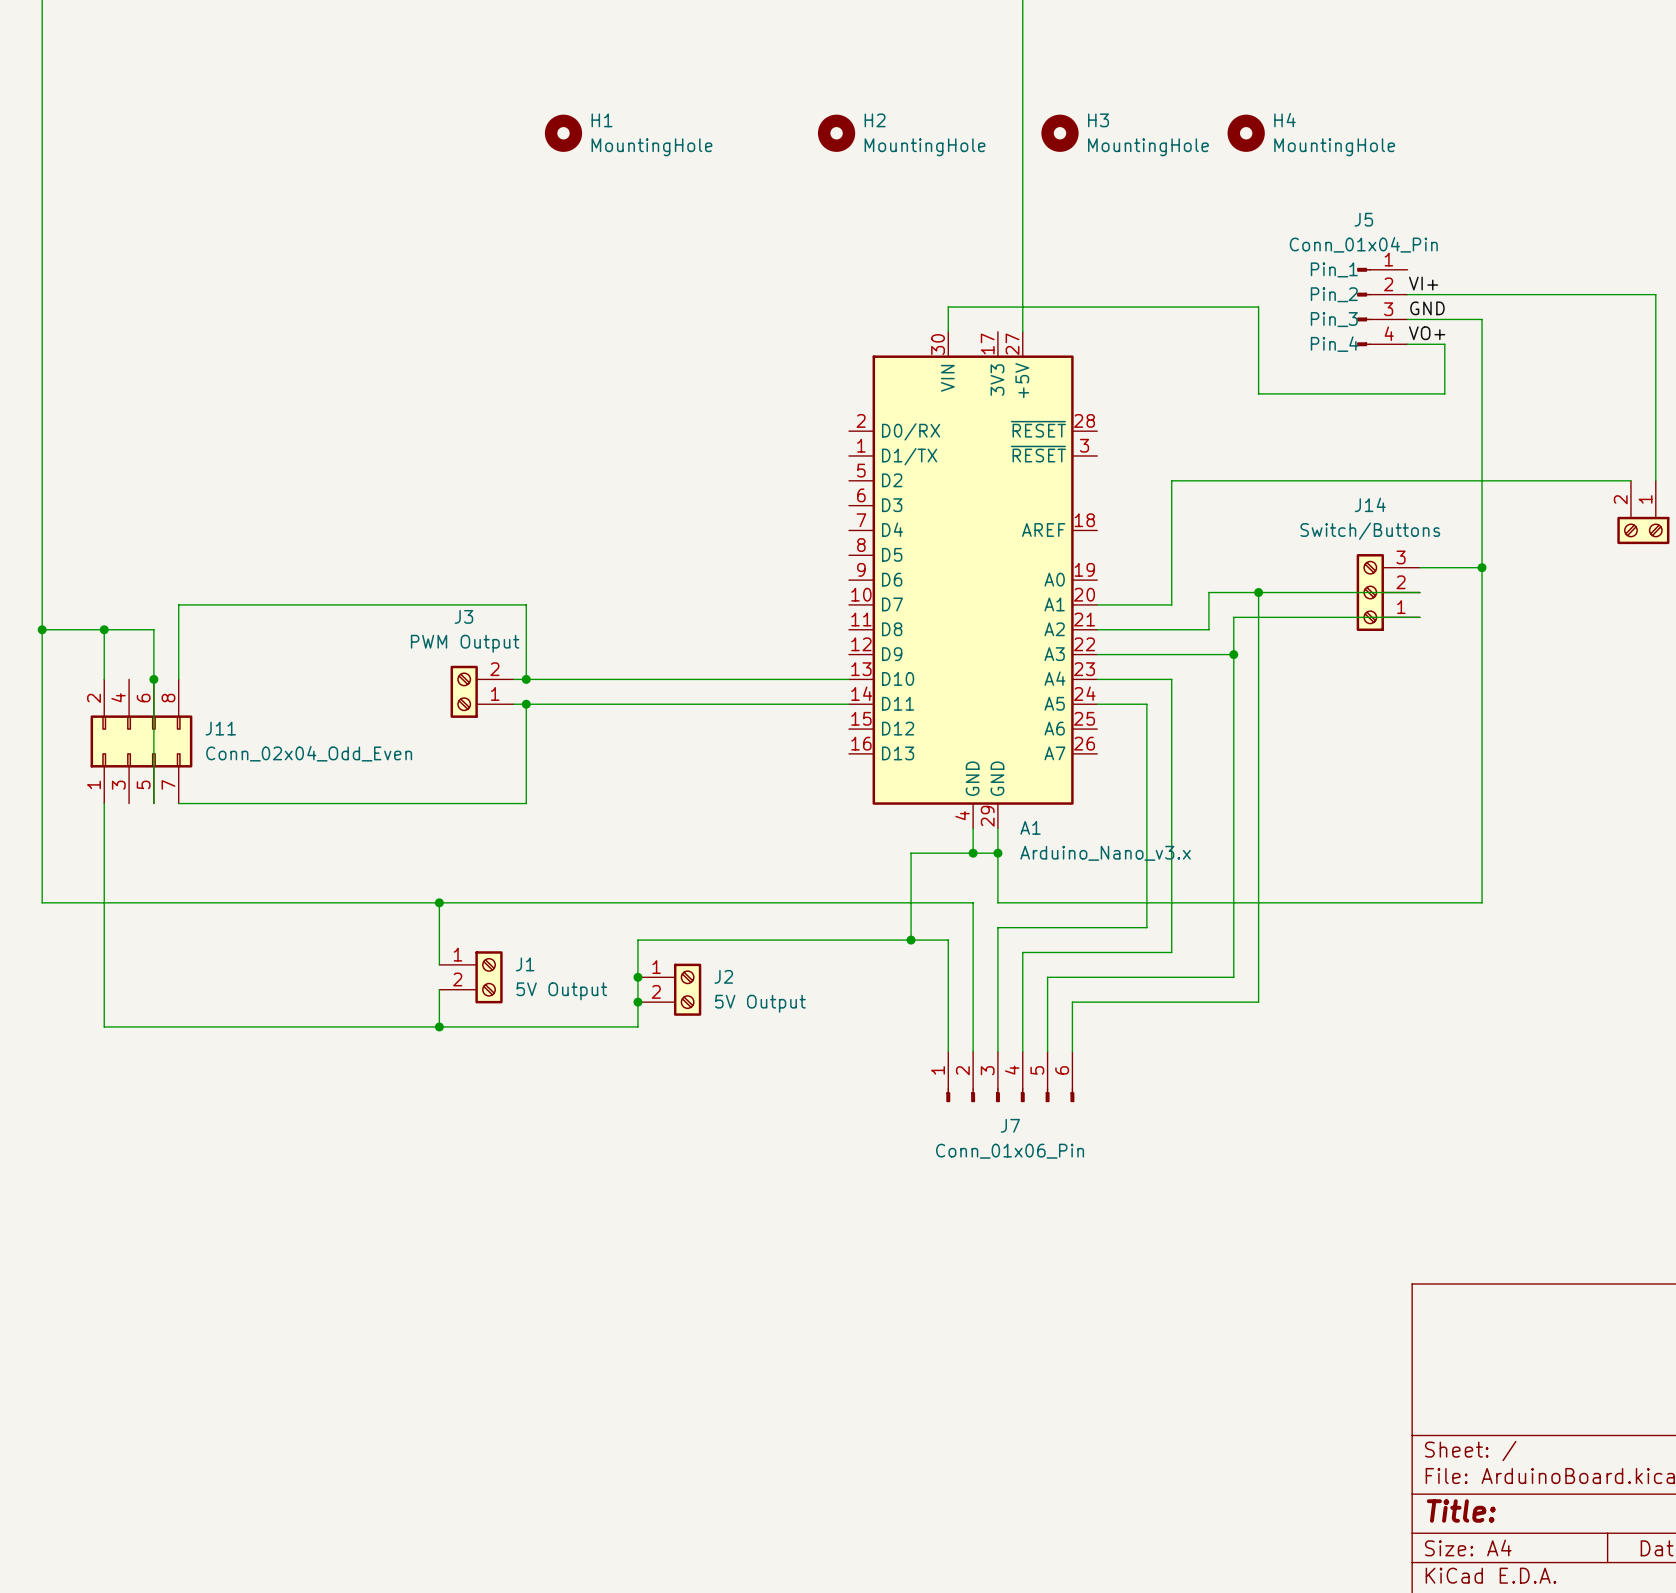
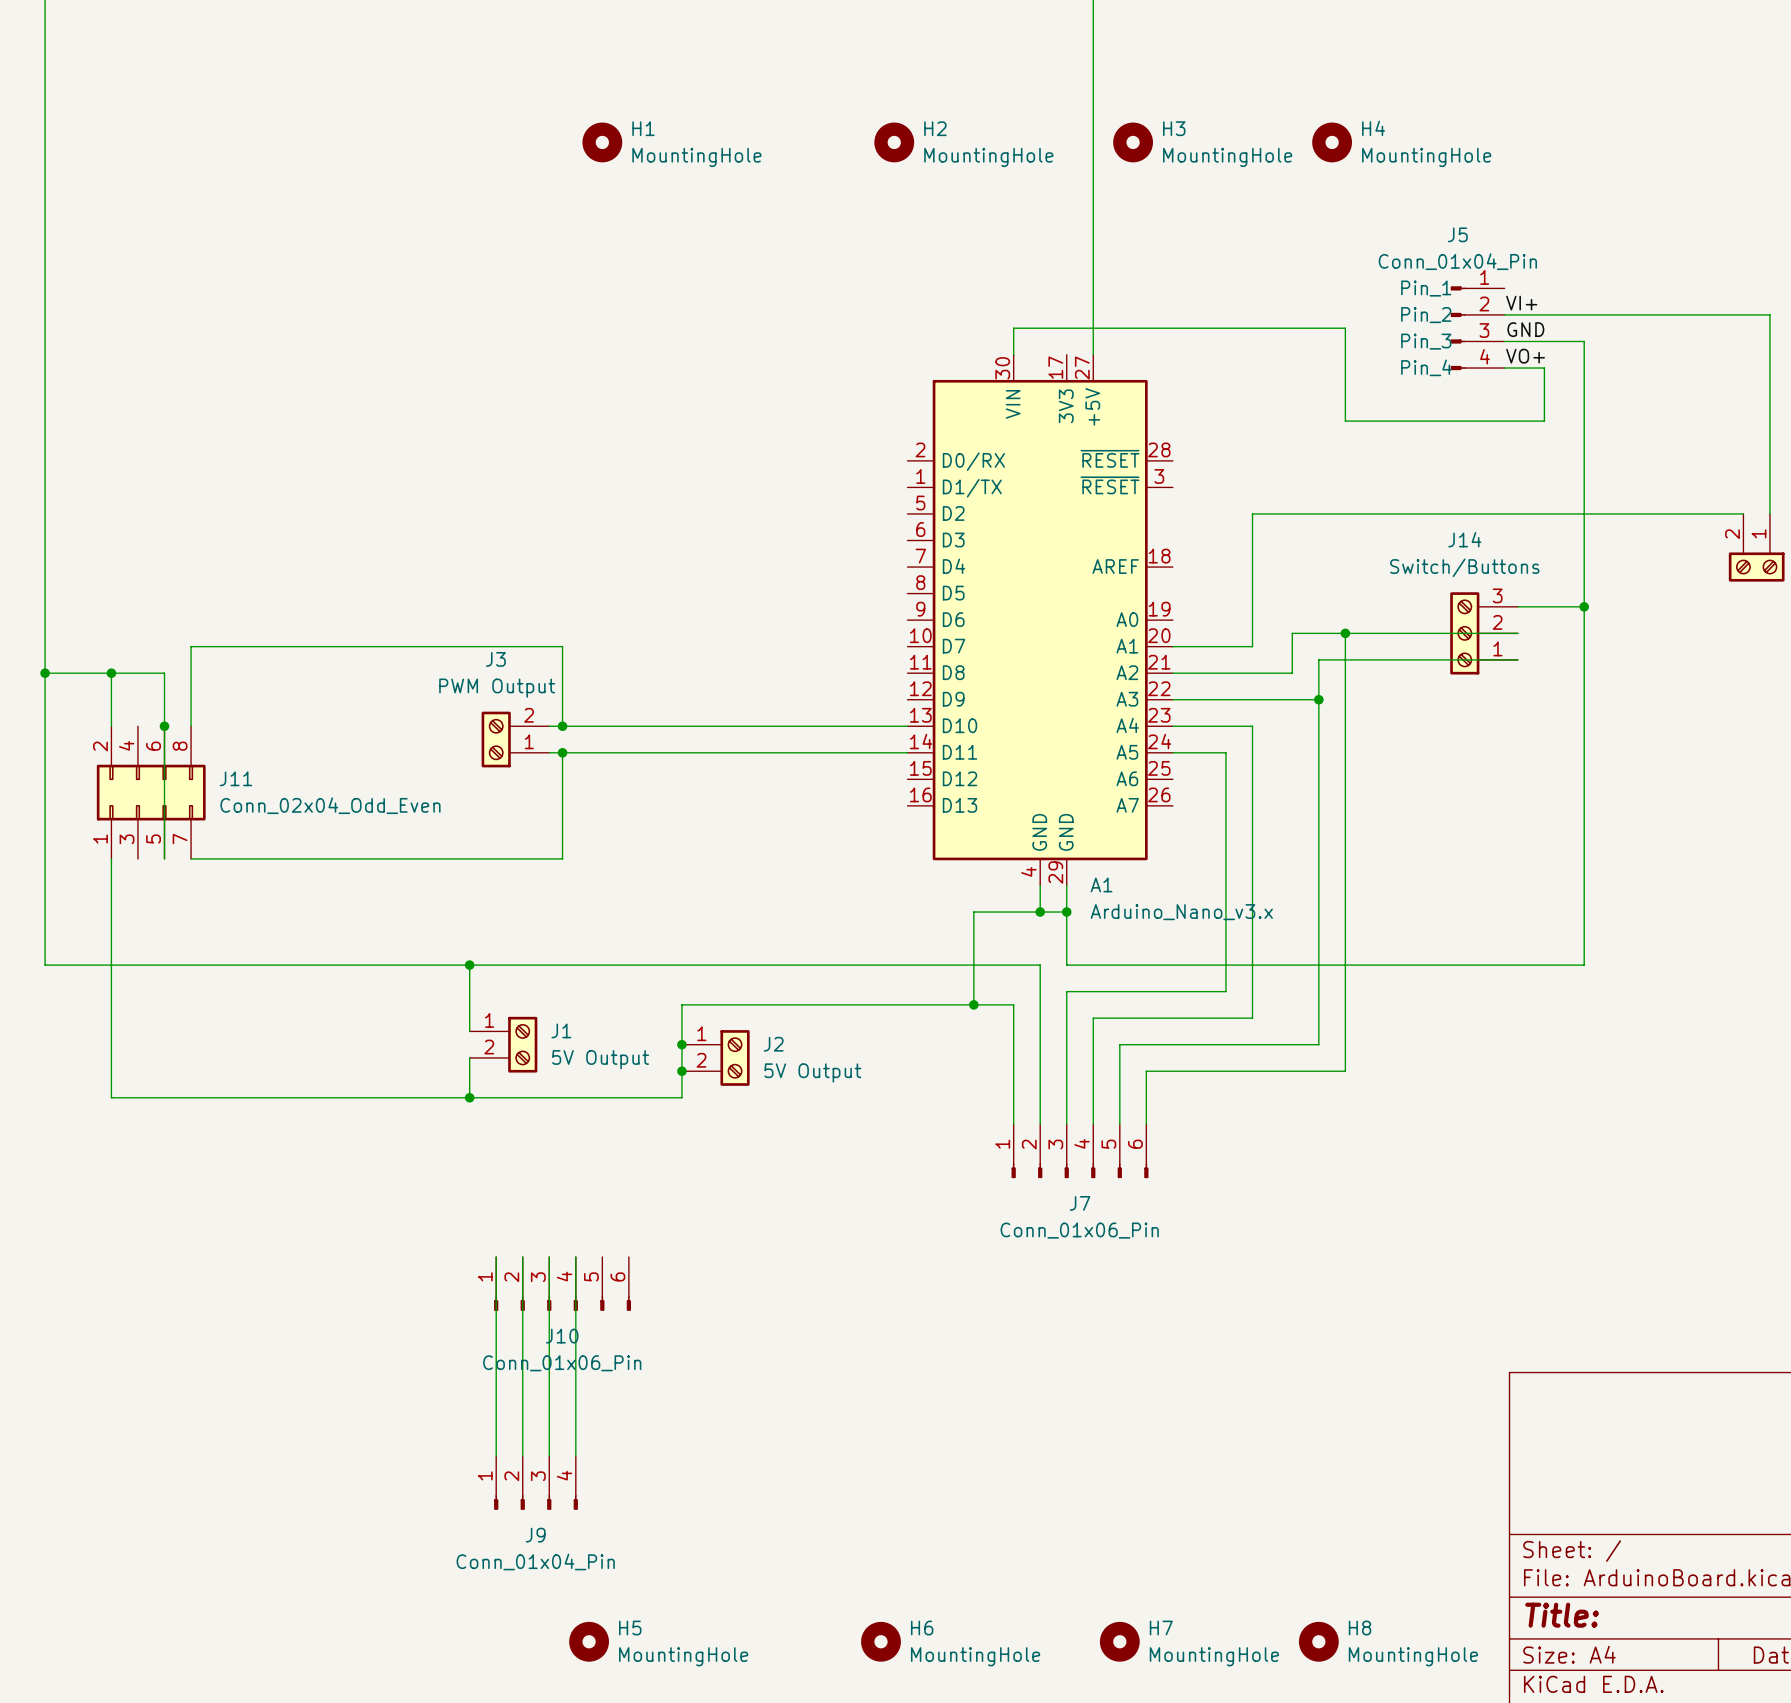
wire: none -> (496, 1256) (496, 1456)
wire: none -> (522, 1256) (522, 1456)
wire: none -> (549, 1256) (549, 1456)
wire: none -> (575, 1256) (575, 1456)
J10: none -> Conn_01x06_Pin (562, 1283)
J9: none -> Conn_01x04_Pin (536, 1482)
H5: none -> MountingHole (589, 1641)
H6: none -> MountingHole (880, 1641)
H7: none -> MountingHole (1119, 1641)
H8: none -> MountingHole (1318, 1641)

